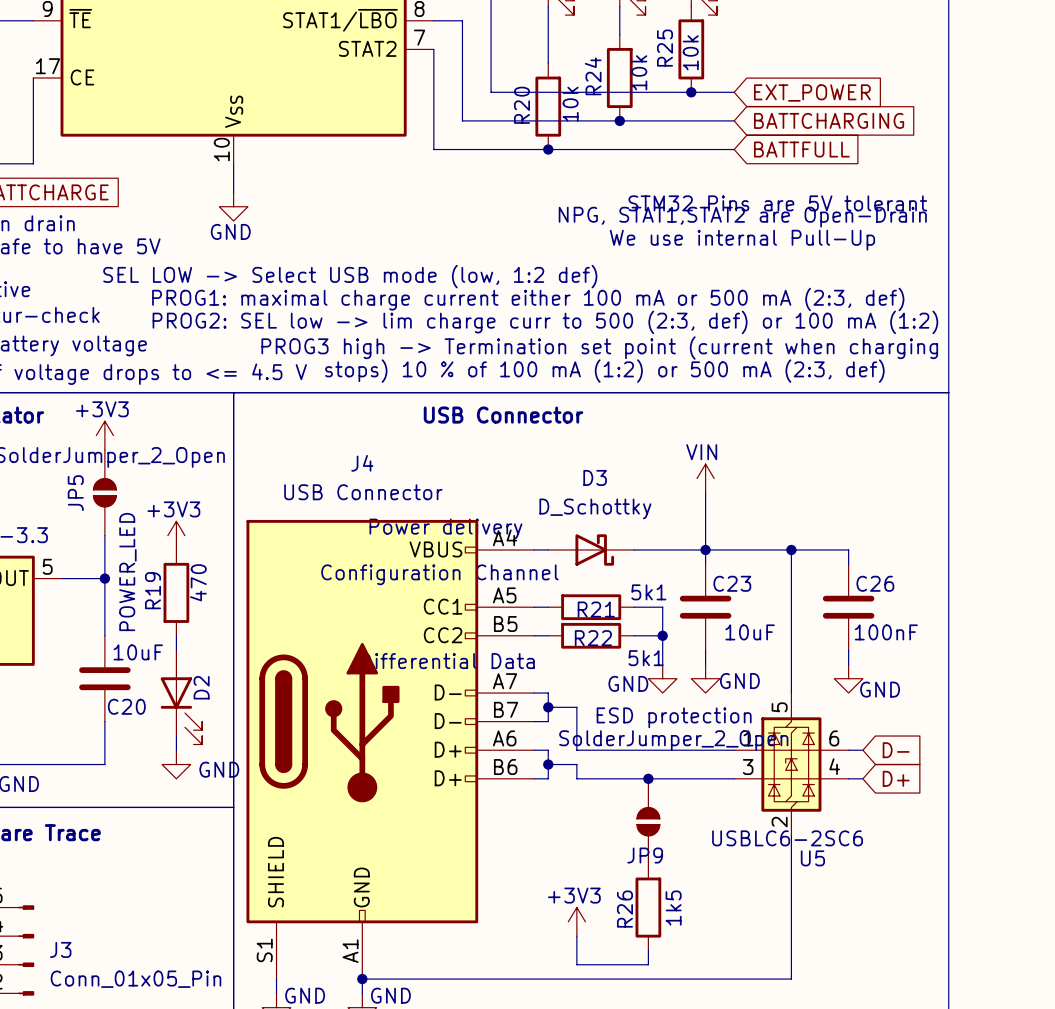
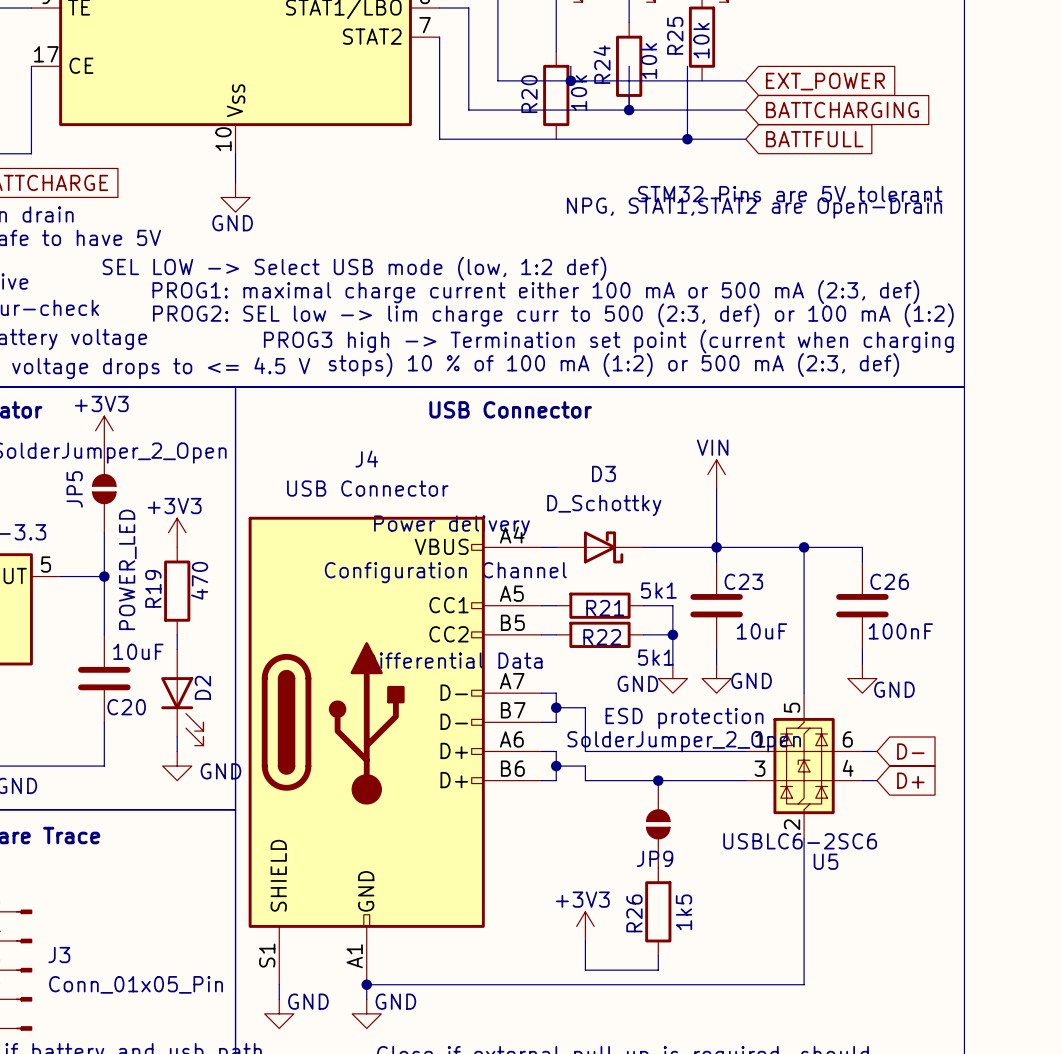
wire: none -> (570, 66) (570, 80)
wire: none -> (629, 66) (629, 110)
wire: none -> (687, 66) (687, 139)
junction position: (691, 92) -> (687, 139)
junction position: (548, 149) -> (570, 80)
text: We use internal Pull-Up (742, 240) -> none

